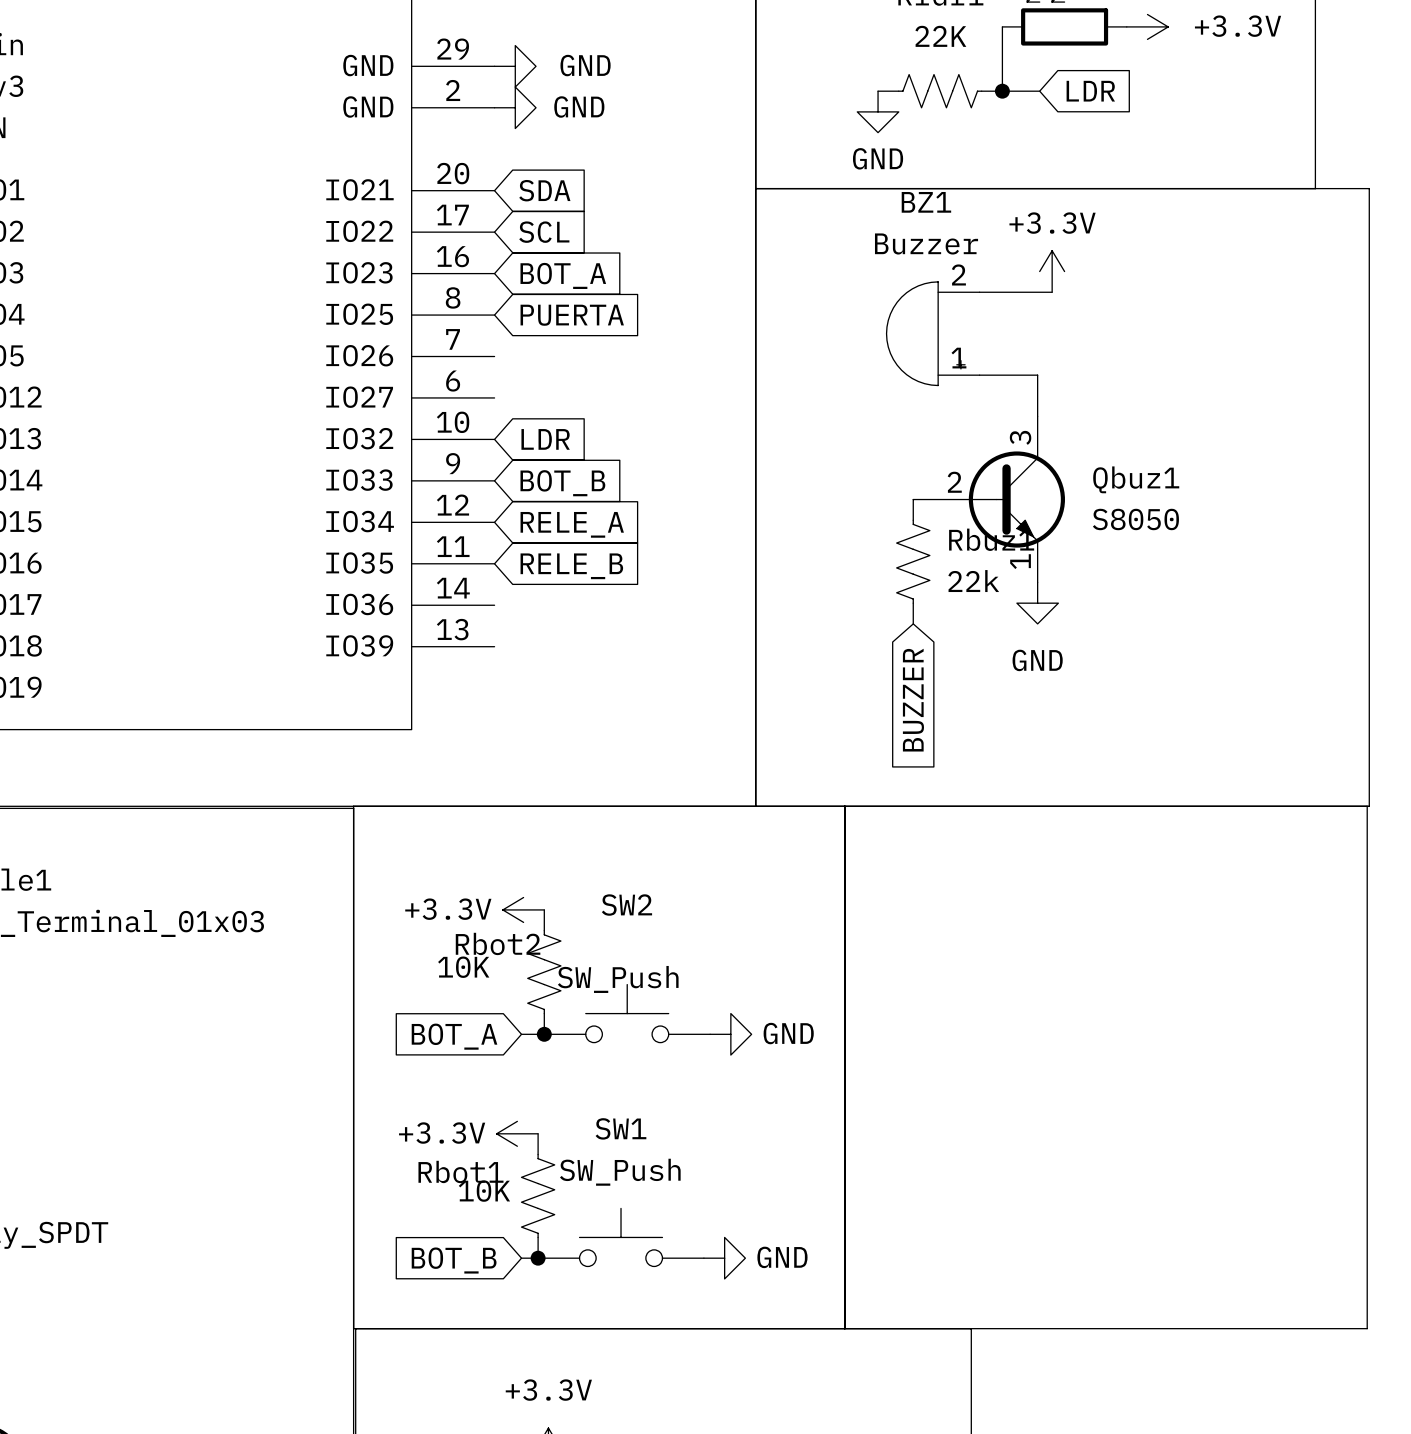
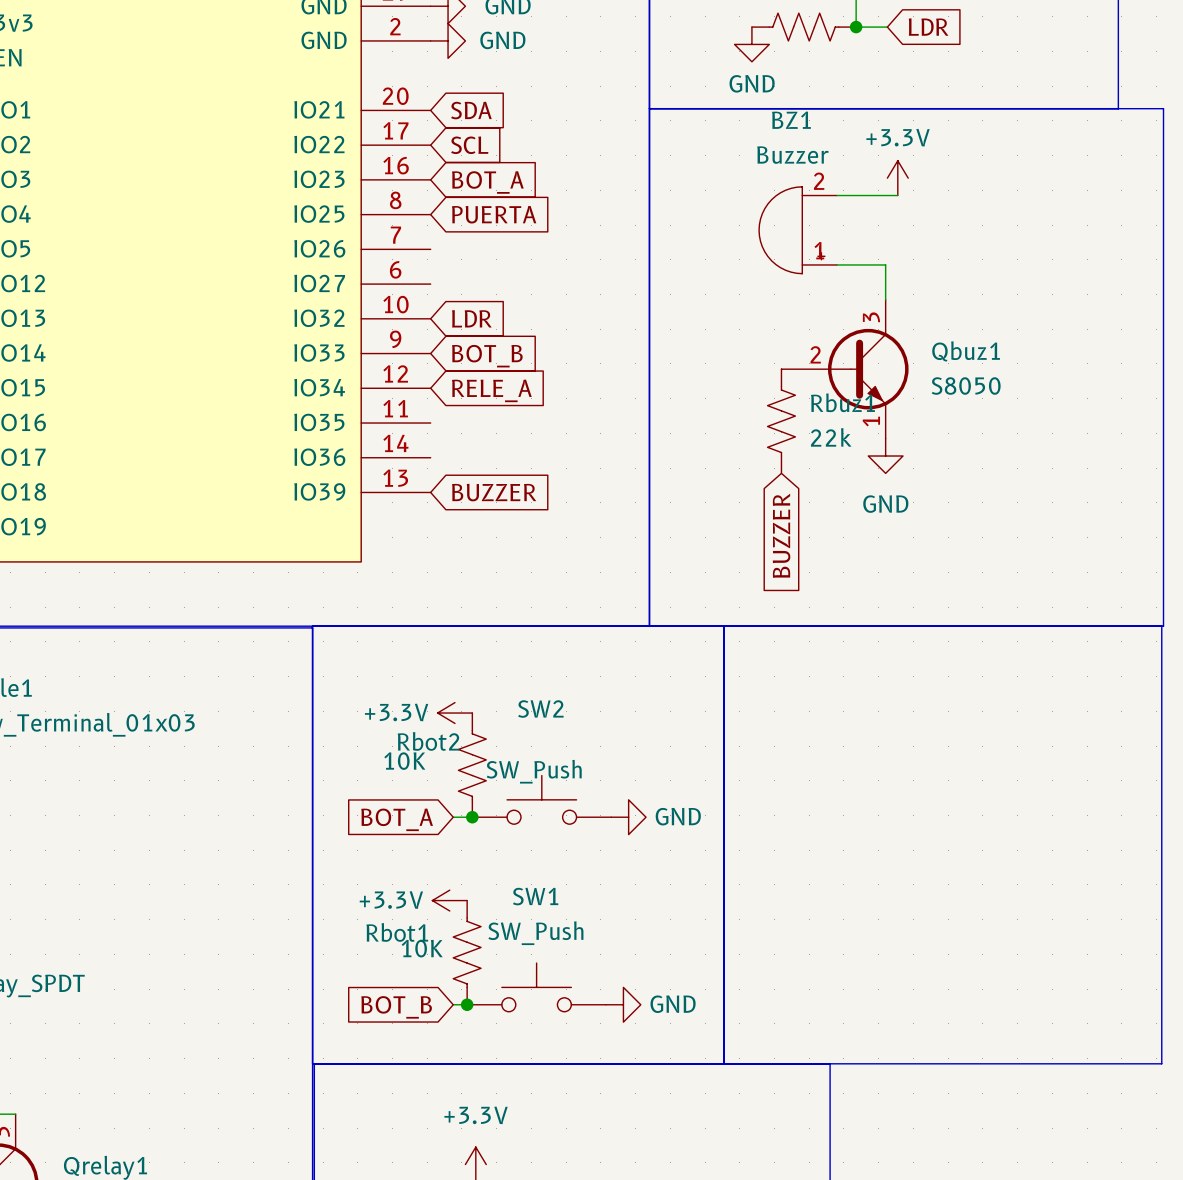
global label: RELE_B (571, 566) -> none
global label: none -> BUZZER (494, 492)

